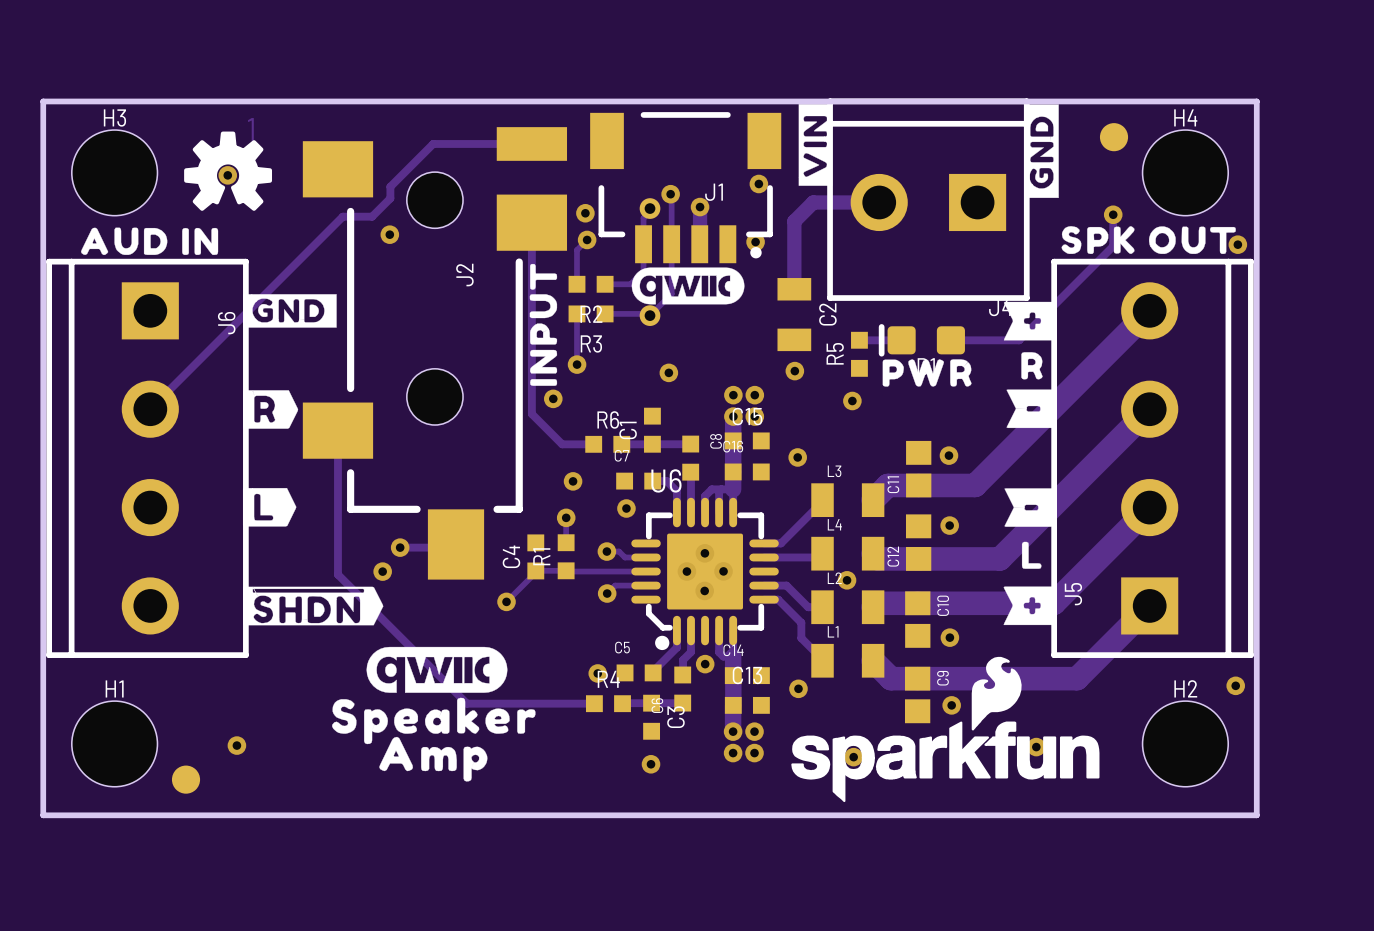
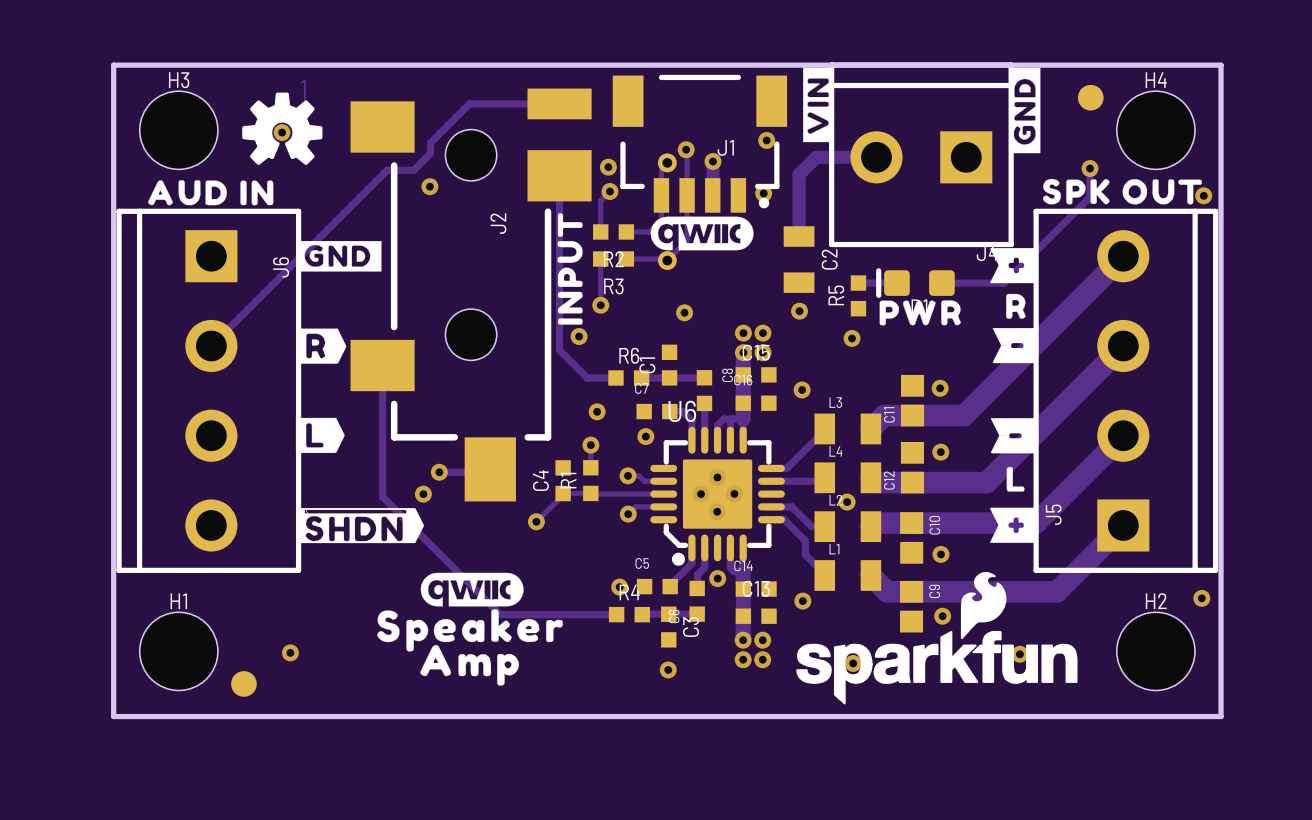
drawing shape: [366, 646, 508, 693] -> [420, 572, 524, 607]

